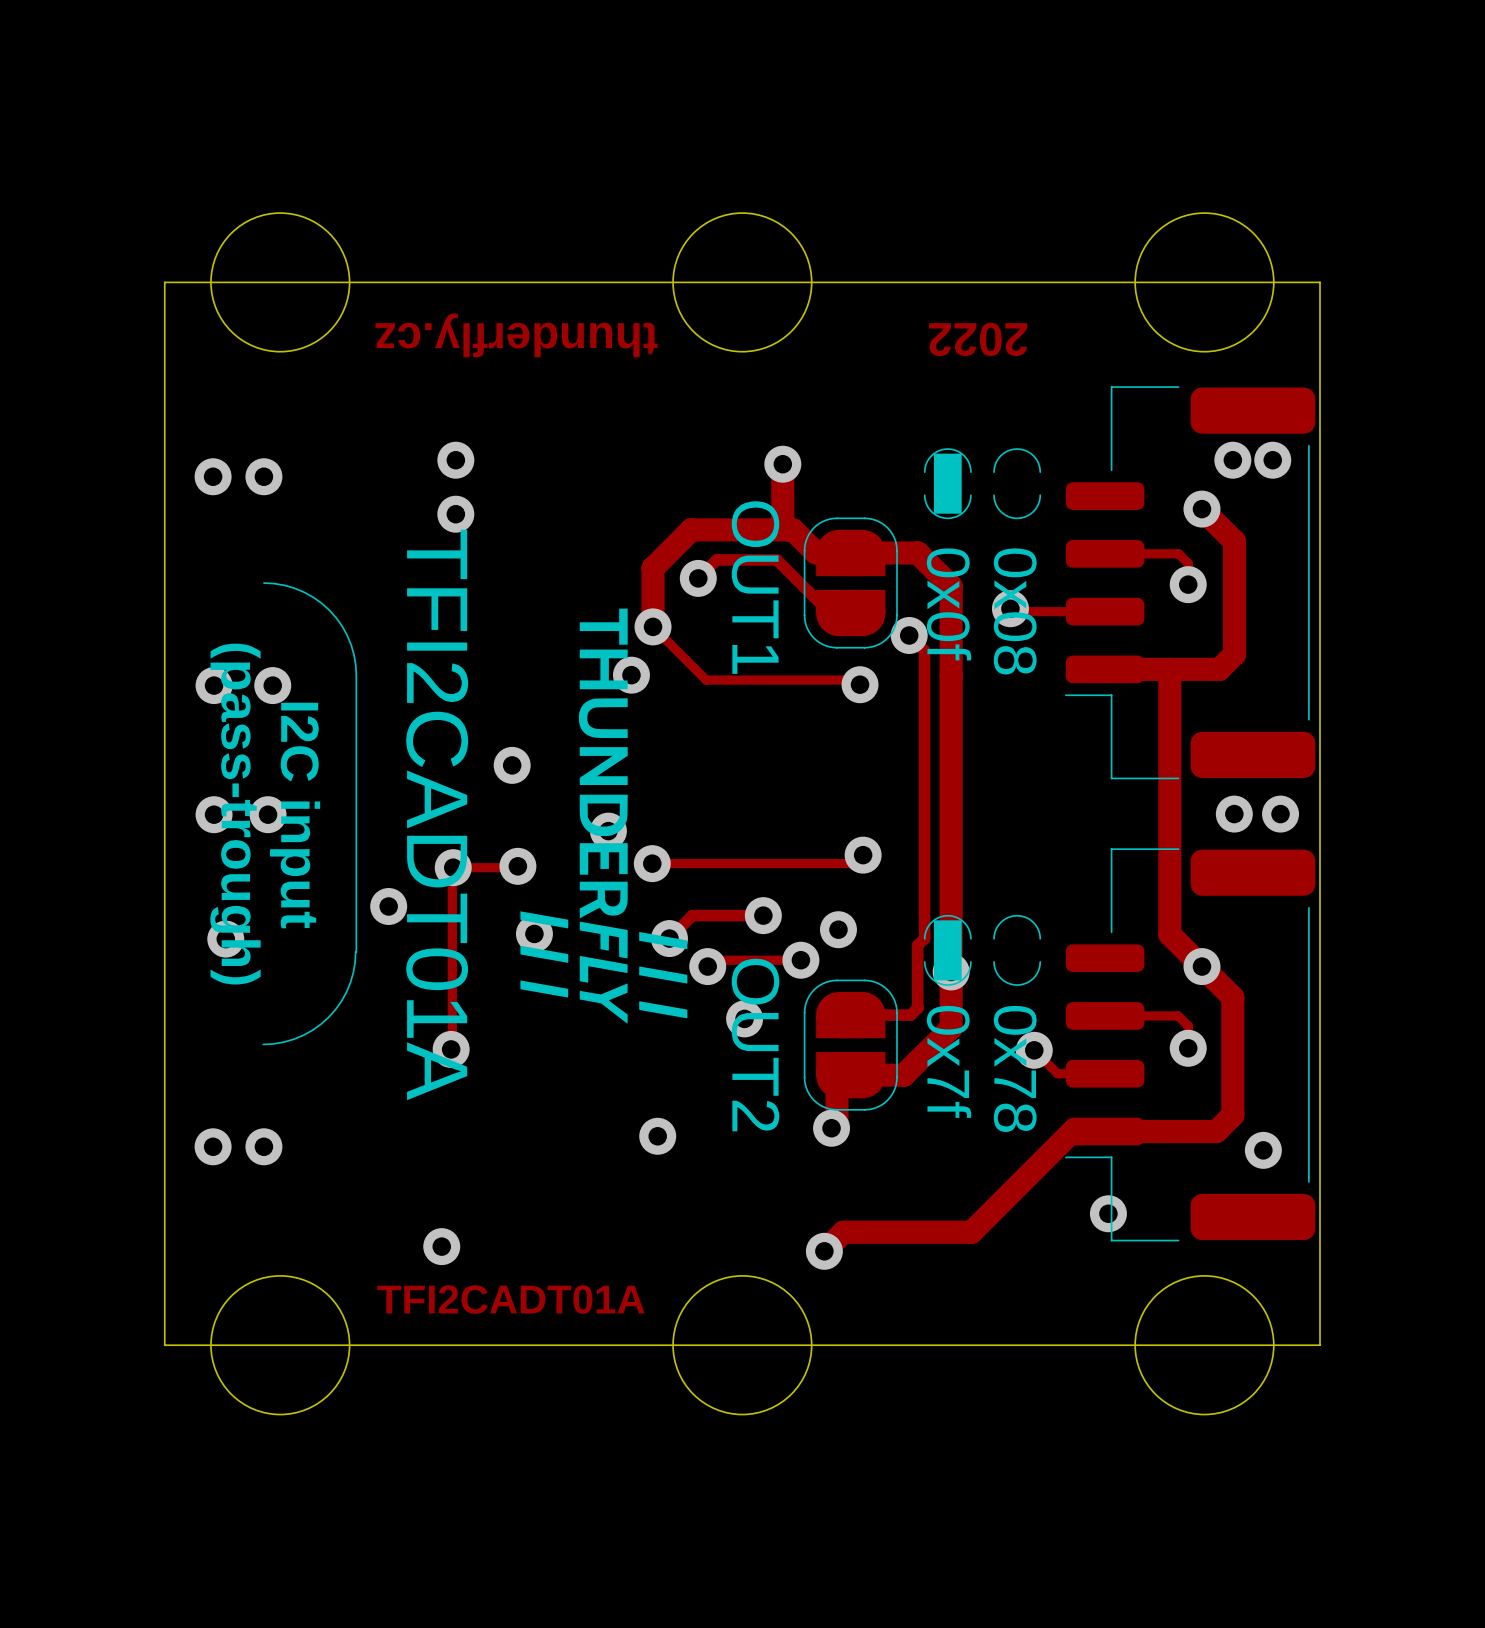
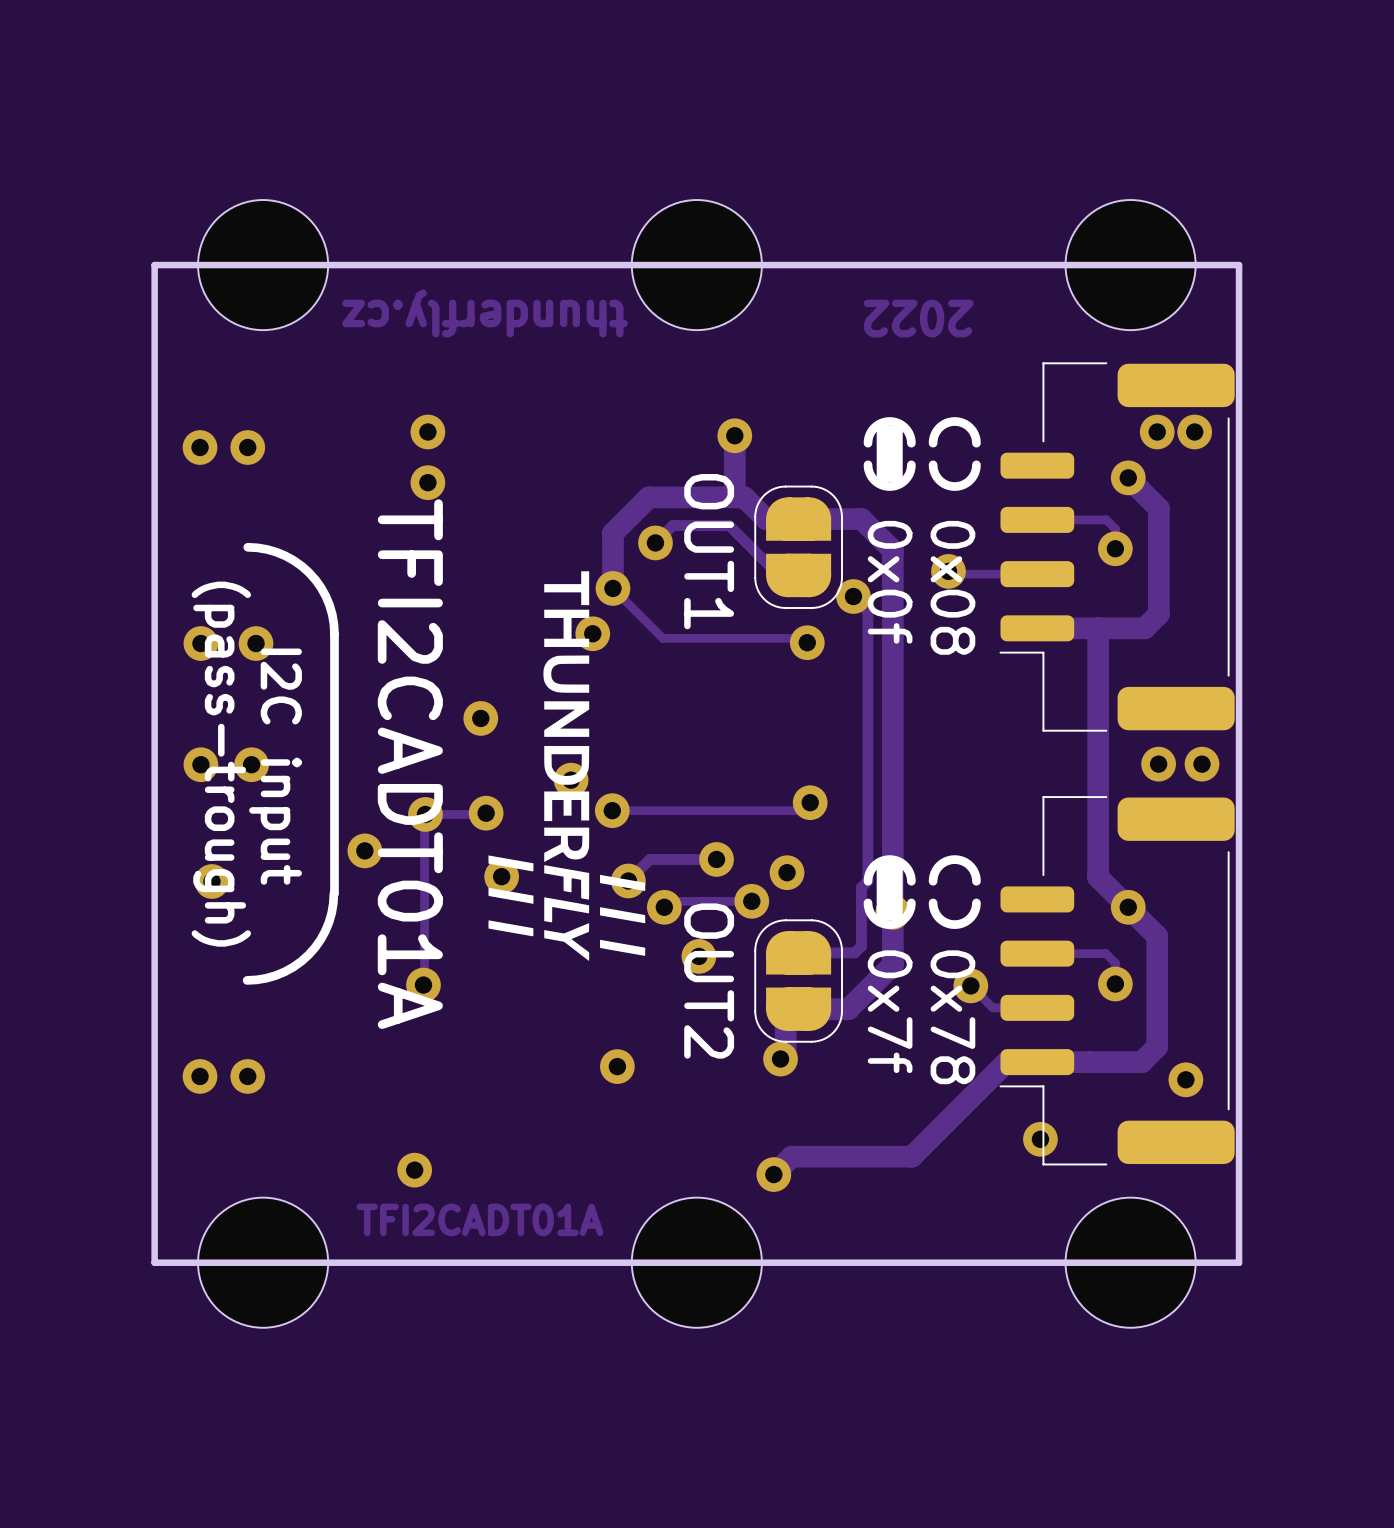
board edge width: thin (164, 282) (1320, 282) (1320, 1345) (164, 1345) (164, 282) -> thick (154, 265) (1239, 265) (1239, 1262) (154, 1262) (154, 265)
line width: thin (924, 472) (926, 463) (931, 455) (938, 450) (947, 449) (956, 450) (964, 455) (969, 463) (970, 472) -> thick (868, 443) (869, 434) (874, 427) (881, 423) (889, 421) (897, 423) (905, 427) (909, 434) (911, 443)
line width: thin (994, 472) (995, 463) (1000, 455) (1008, 450) (1017, 449) (1025, 450) (1033, 455) (1038, 463) (1040, 472) -> thick (933, 443) (934, 434) (939, 427) (946, 423) (954, 421) (963, 423) (970, 427) (974, 434) (976, 443)
line width: thin (924, 495) (926, 503) (930, 510) (937, 515) (947, 518) (956, 516) (963, 512) (968, 505) (970, 495) -> thick (868, 464) (873, 479) (879, 484) (889, 486) (904, 481) (908, 474) (911, 464)
line width: thin (994, 495) (995, 504) (1000, 511) (1008, 516) (1017, 518) (1025, 516) (1033, 511) (1038, 504) (1040, 495) -> thick (933, 464) (934, 473) (939, 480) (946, 484) (954, 486) (963, 484) (970, 480) (974, 473) (976, 464)
line width: thin (263, 583) (284, 585) (304, 592) (329, 610) (347, 635) (354, 654) (356, 675) -> thick (247, 547) (267, 549) (285, 555) (309, 572) (325, 596) (332, 614) (334, 634)
line width: thin (356, 676) (356, 952) -> thick (334, 634) (334, 893)
line width: thin (924, 938) (926, 930) (932, 921) (939, 917) (947, 915) (956, 917) (963, 921) (968, 928) (970, 938) -> thick (868, 881) (869, 873) (875, 865) (889, 859) (904, 865) (908, 871) (911, 881)
line width: thin (994, 938) (995, 930) (1000, 922) (1008, 917) (1017, 915) (1025, 917) (1033, 922) (1038, 930) (1040, 938) -> thick (933, 881) (934, 872) (939, 865) (946, 861) (954, 859) (963, 861) (970, 865) (974, 872) (976, 881)
line width: thin (355, 952) (350, 982) (341, 1001) (328, 1017) (303, 1035) (283, 1042) (263, 1044) -> thick (333, 893) (329, 922) (320, 939) (308, 955) (284, 971) (266, 978) (247, 980)
line width: thin (924, 961) (926, 970) (930, 977) (937, 982) (947, 985) (956, 983) (963, 979) (969, 970) (970, 961) -> thick (868, 902) (873, 917) (879, 922) (889, 924) (904, 919) (909, 910) (911, 902)
line width: thin (994, 961) (995, 970) (1000, 978) (1008, 983) (1017, 985) (1025, 983) (1033, 978) (1038, 970) (1040, 961) -> thick (933, 902) (934, 911) (939, 918) (946, 922) (954, 924) (963, 922) (970, 918) (974, 911) (976, 902)

